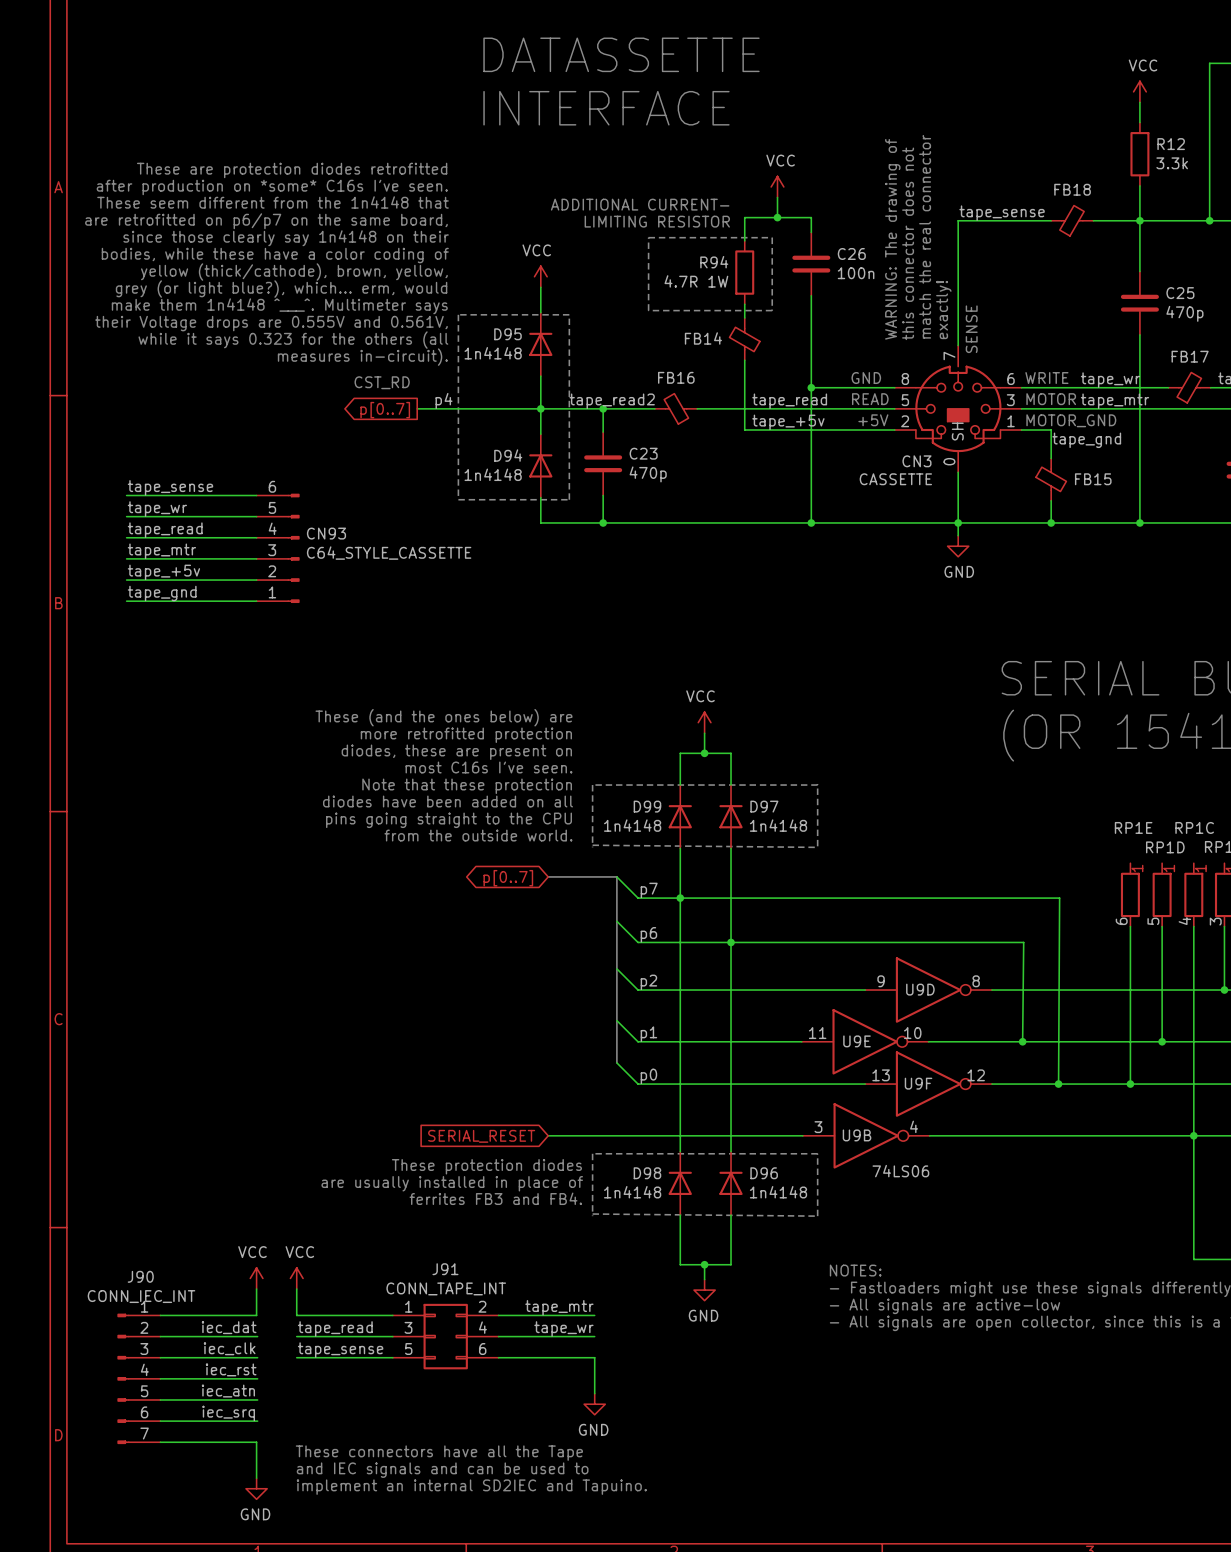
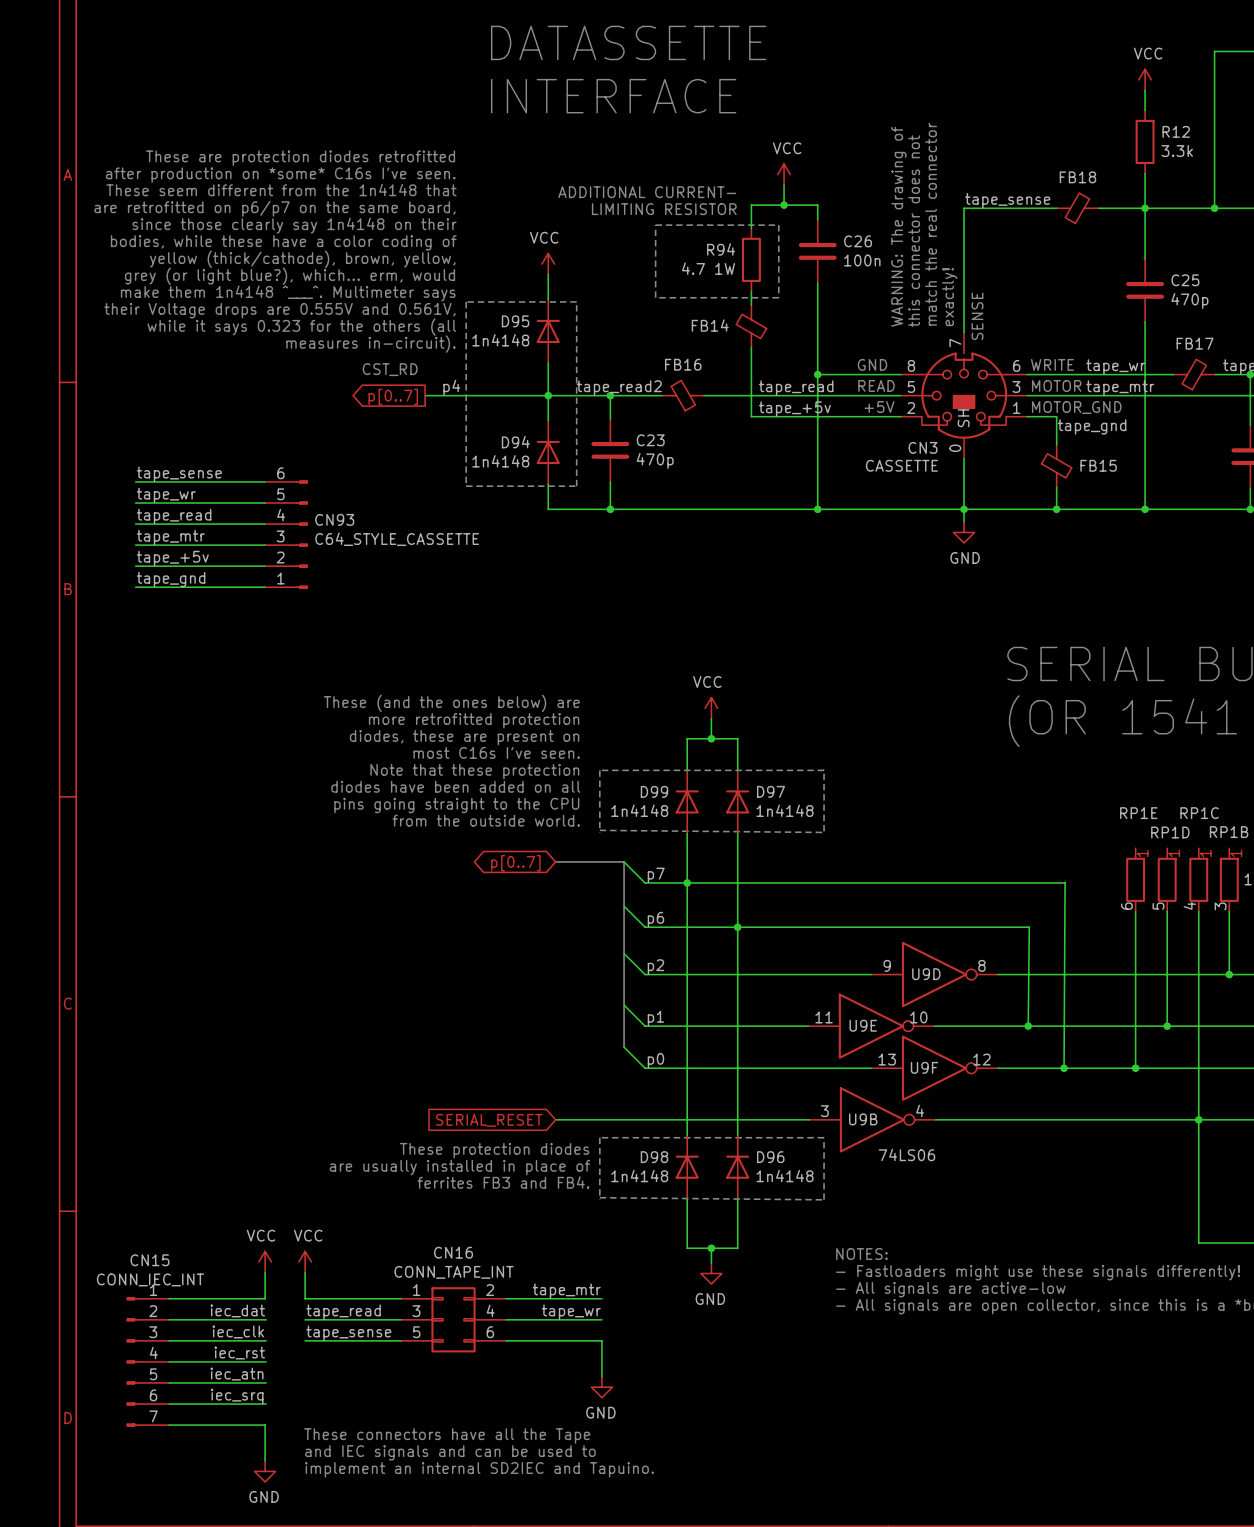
R94 value: 4.7R 1W (696, 281) -> 4.7 1W (708, 268)
J91 name: J91 (445, 1269) -> CN16 (453, 1252)
J90 name: J90 (140, 1276) -> CN15 (149, 1260)

